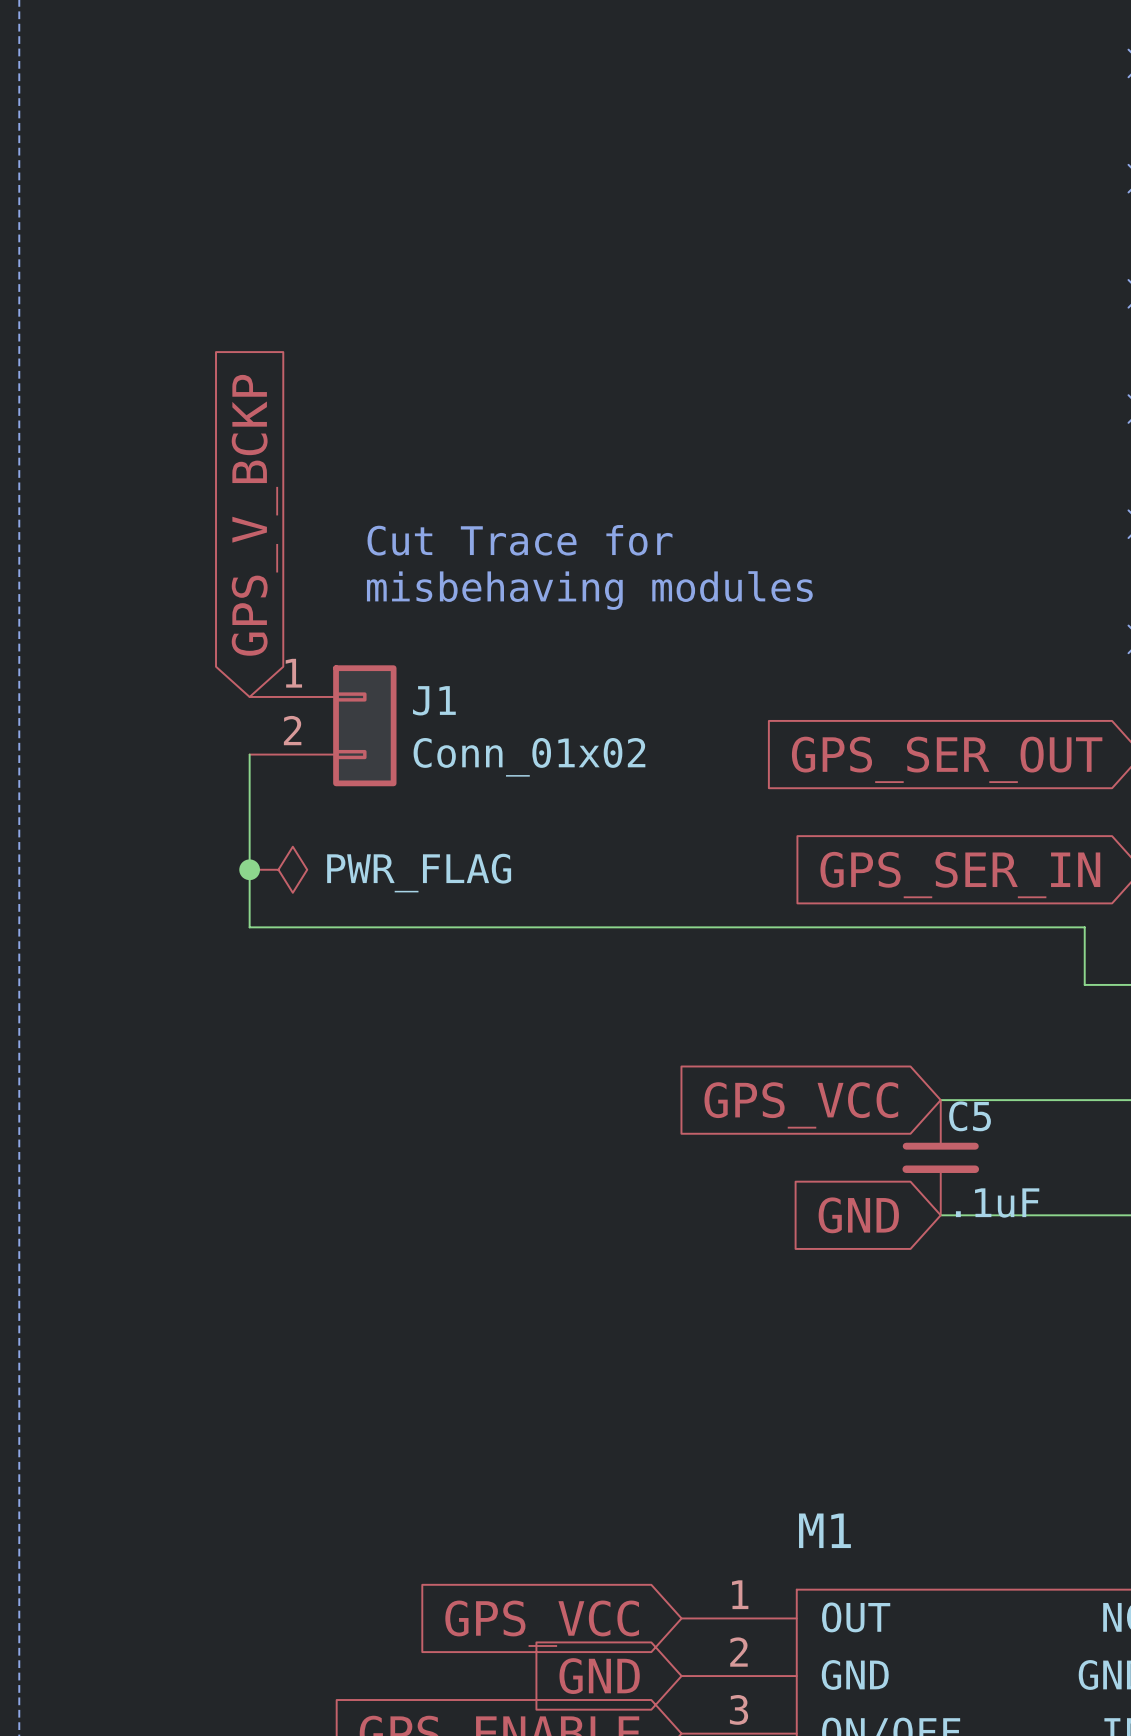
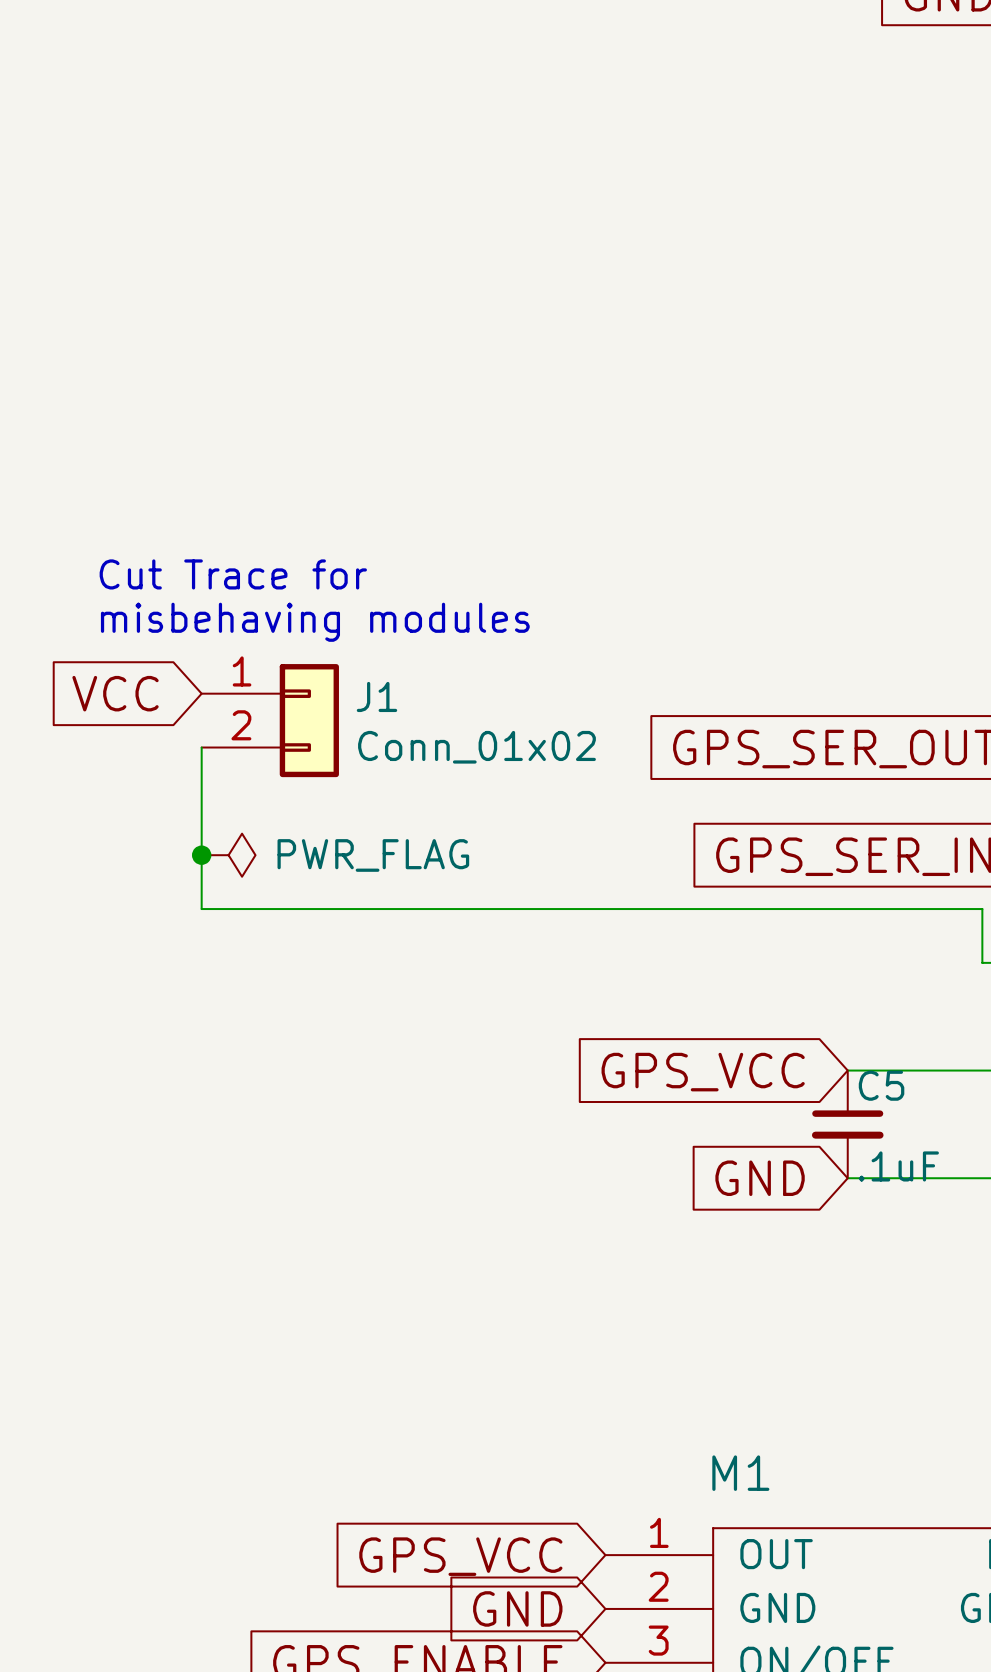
global label: GPS_V_BCKP (254, 515) -> VCC (115, 693)
text position: Cut Trace for (519, 540) -> Cut Trace for (233, 574)
text position: misbehaving modules (589, 590) -> misbehaving modules (315, 622)

